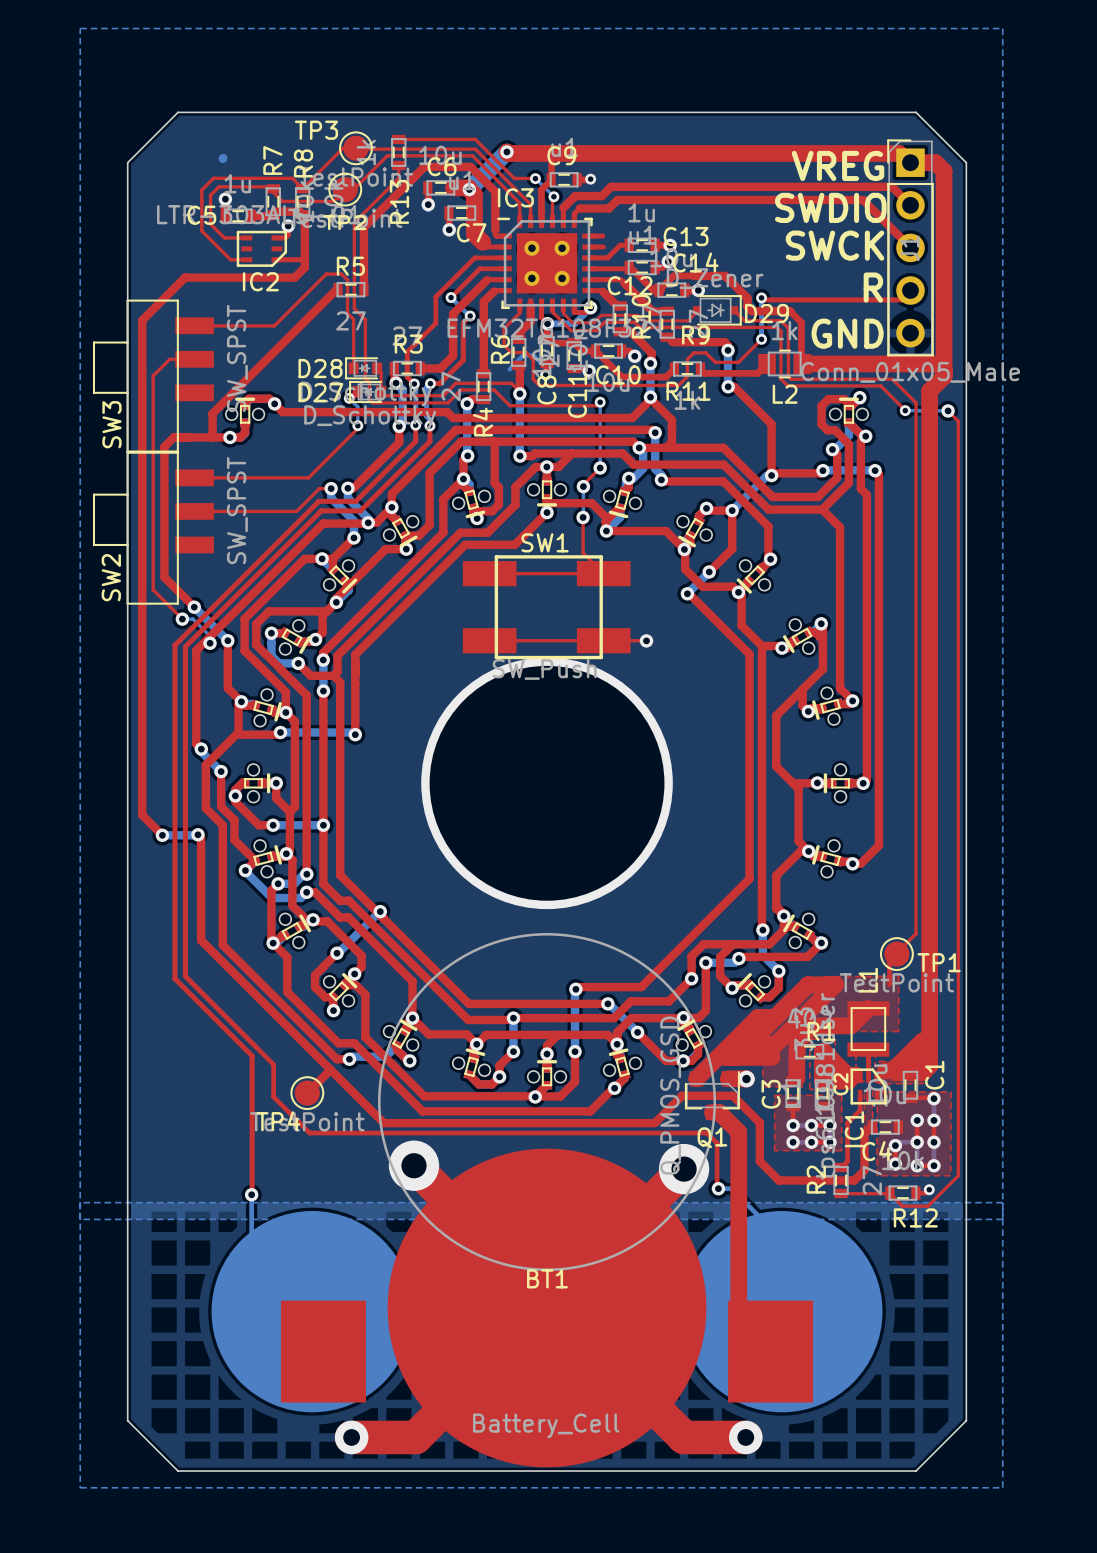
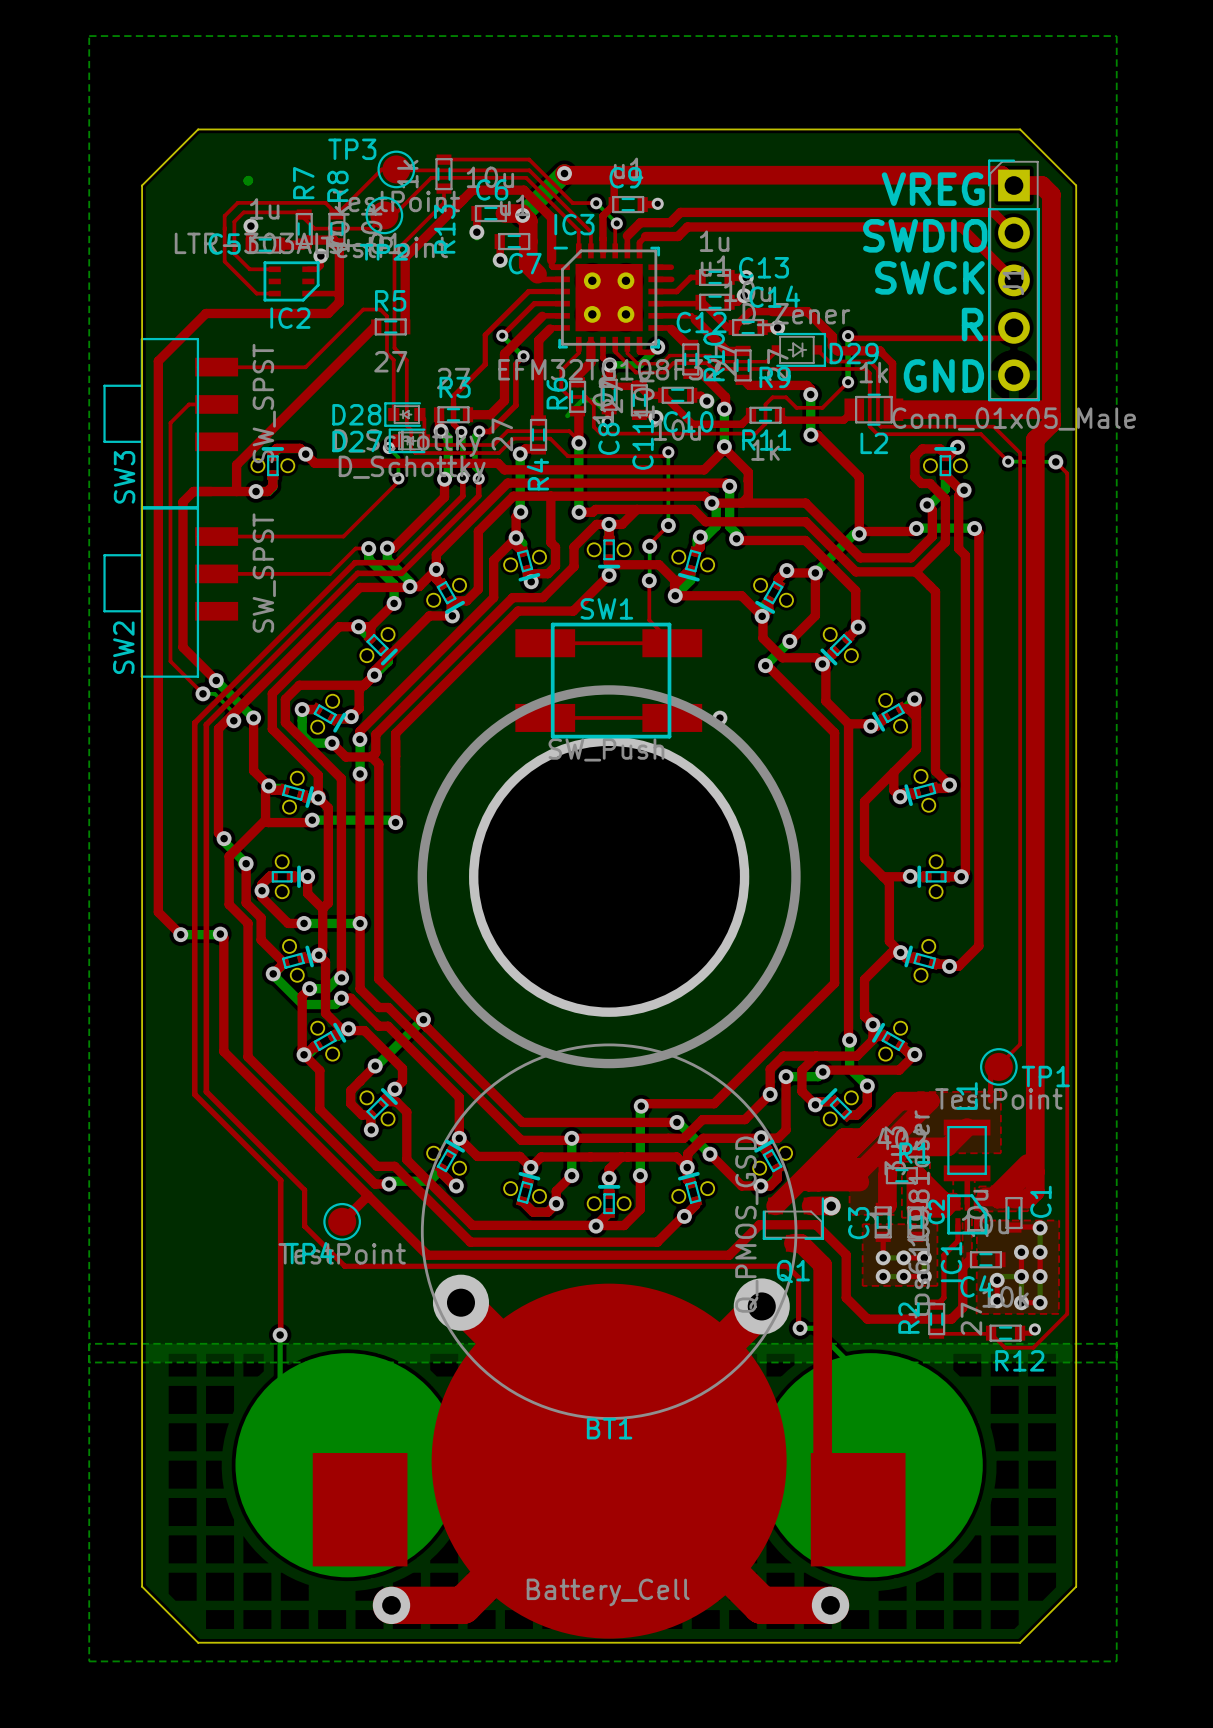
drawing: none -> [417, 685, 801, 1069]

